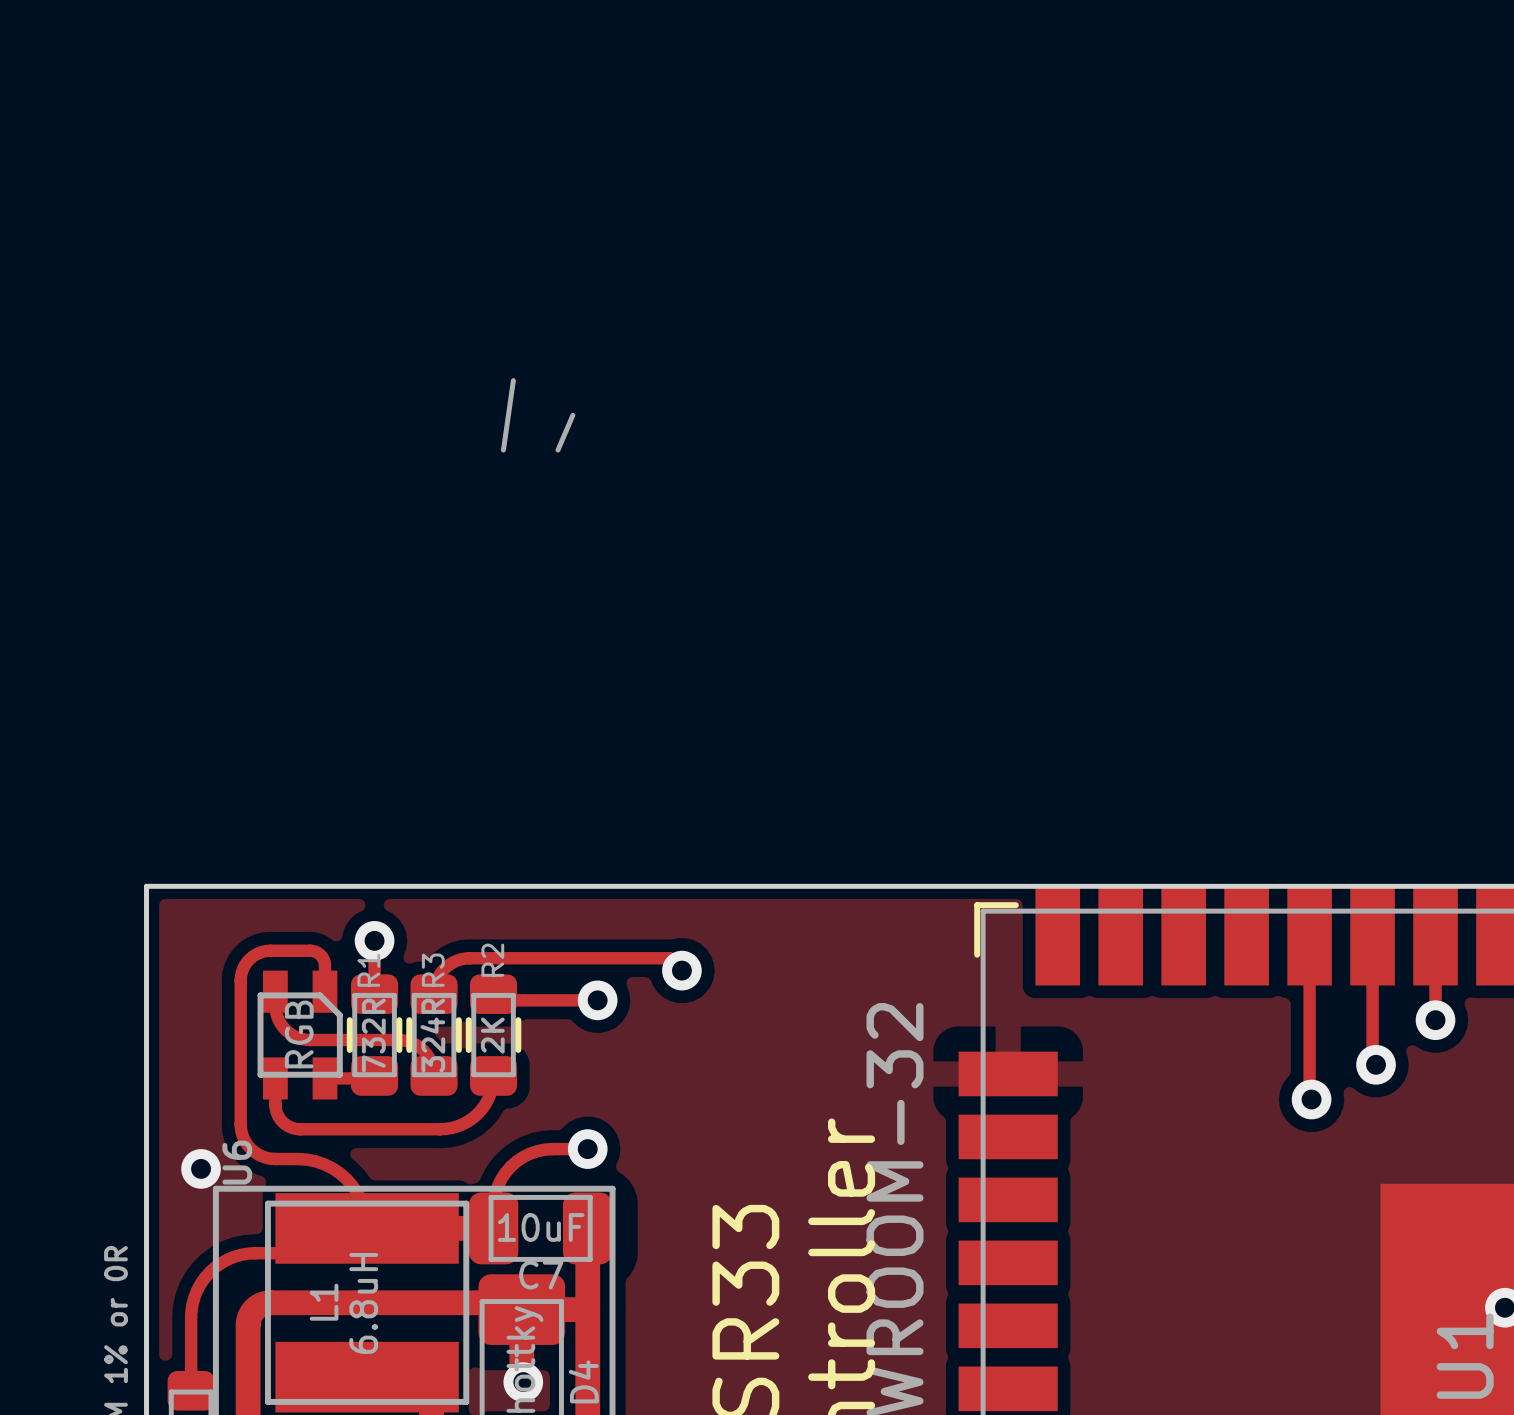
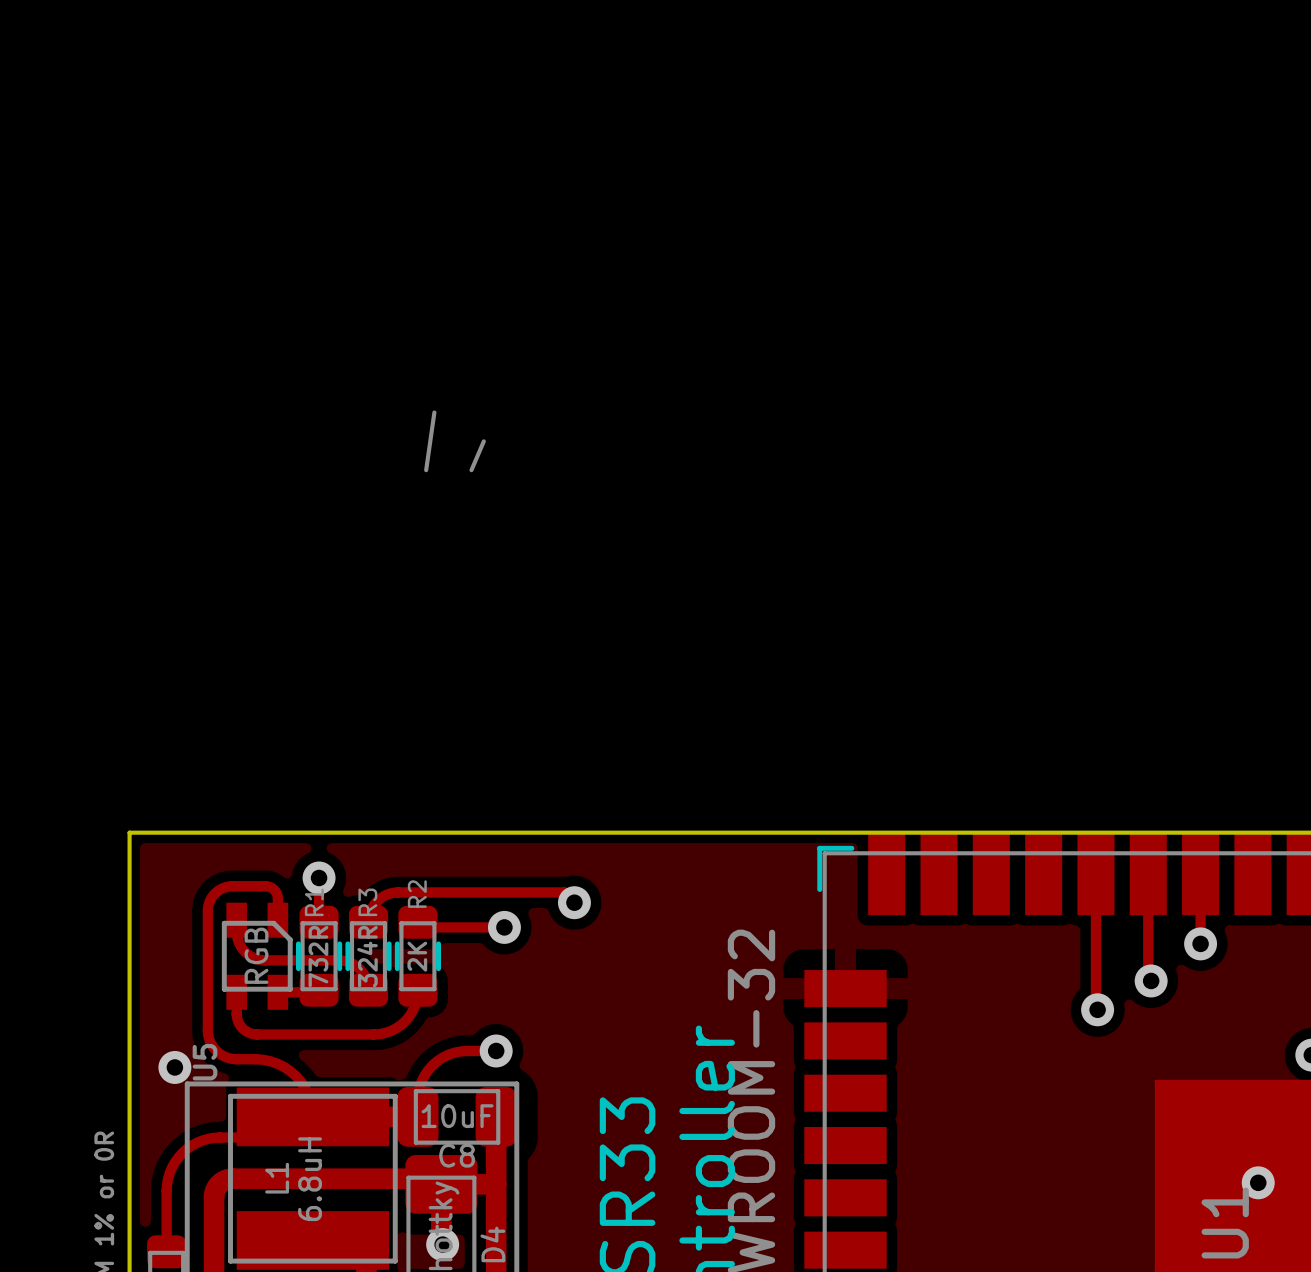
U6 name: U6 (237, 1162) -> U5 (205, 1062)
C7 name: C7 (541, 1275) -> C8 (457, 1155)

